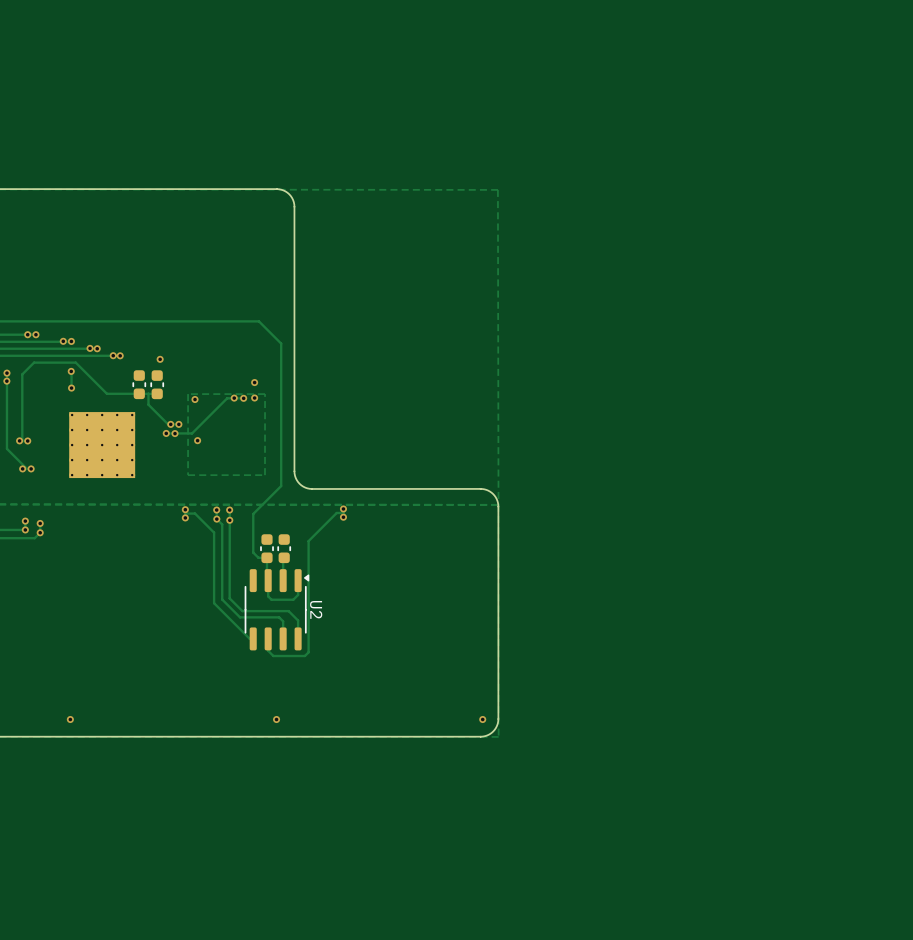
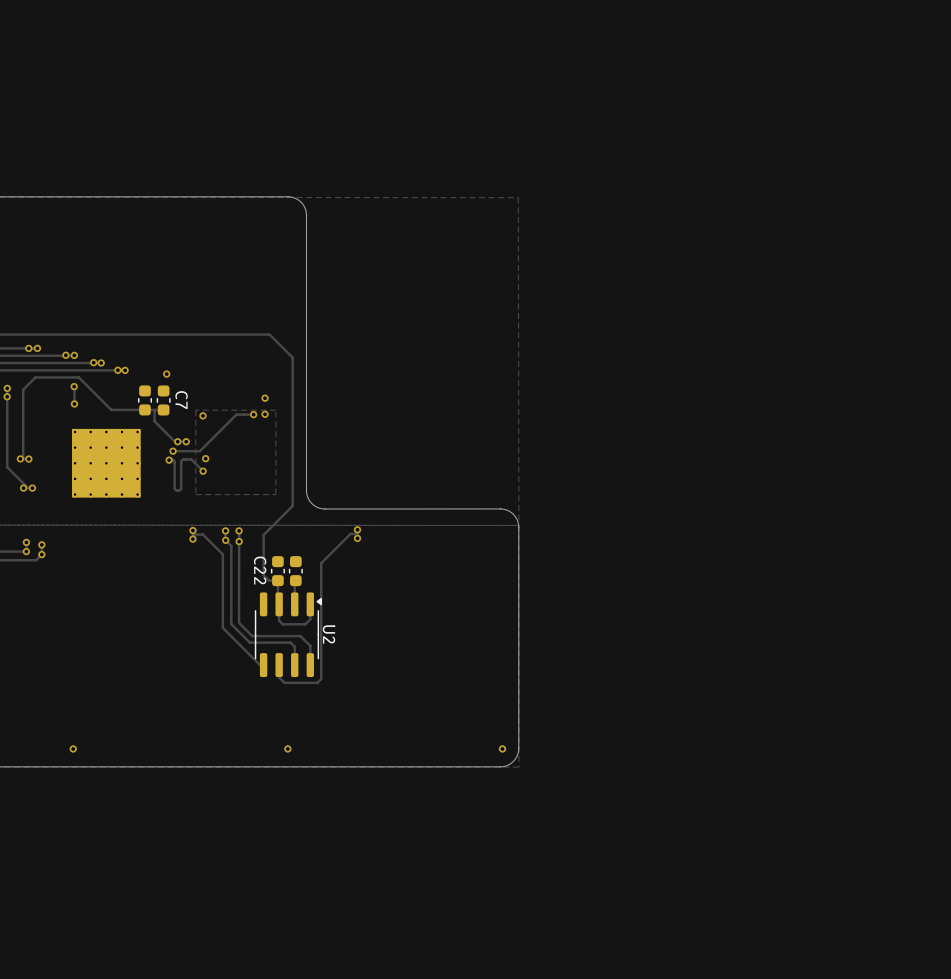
C7 name: none -> C7 (181, 400)
via: (234, 398) -> none
via: (174, 433) -> none
track: none -> (169, 460) (174, 461) (174, 488) (176, 490) (181, 488) (182, 460) (191, 459) (203, 471)
via: none -> (169, 460)
via: none -> (203, 471)
C22 name: none -> C22 (260, 570)

